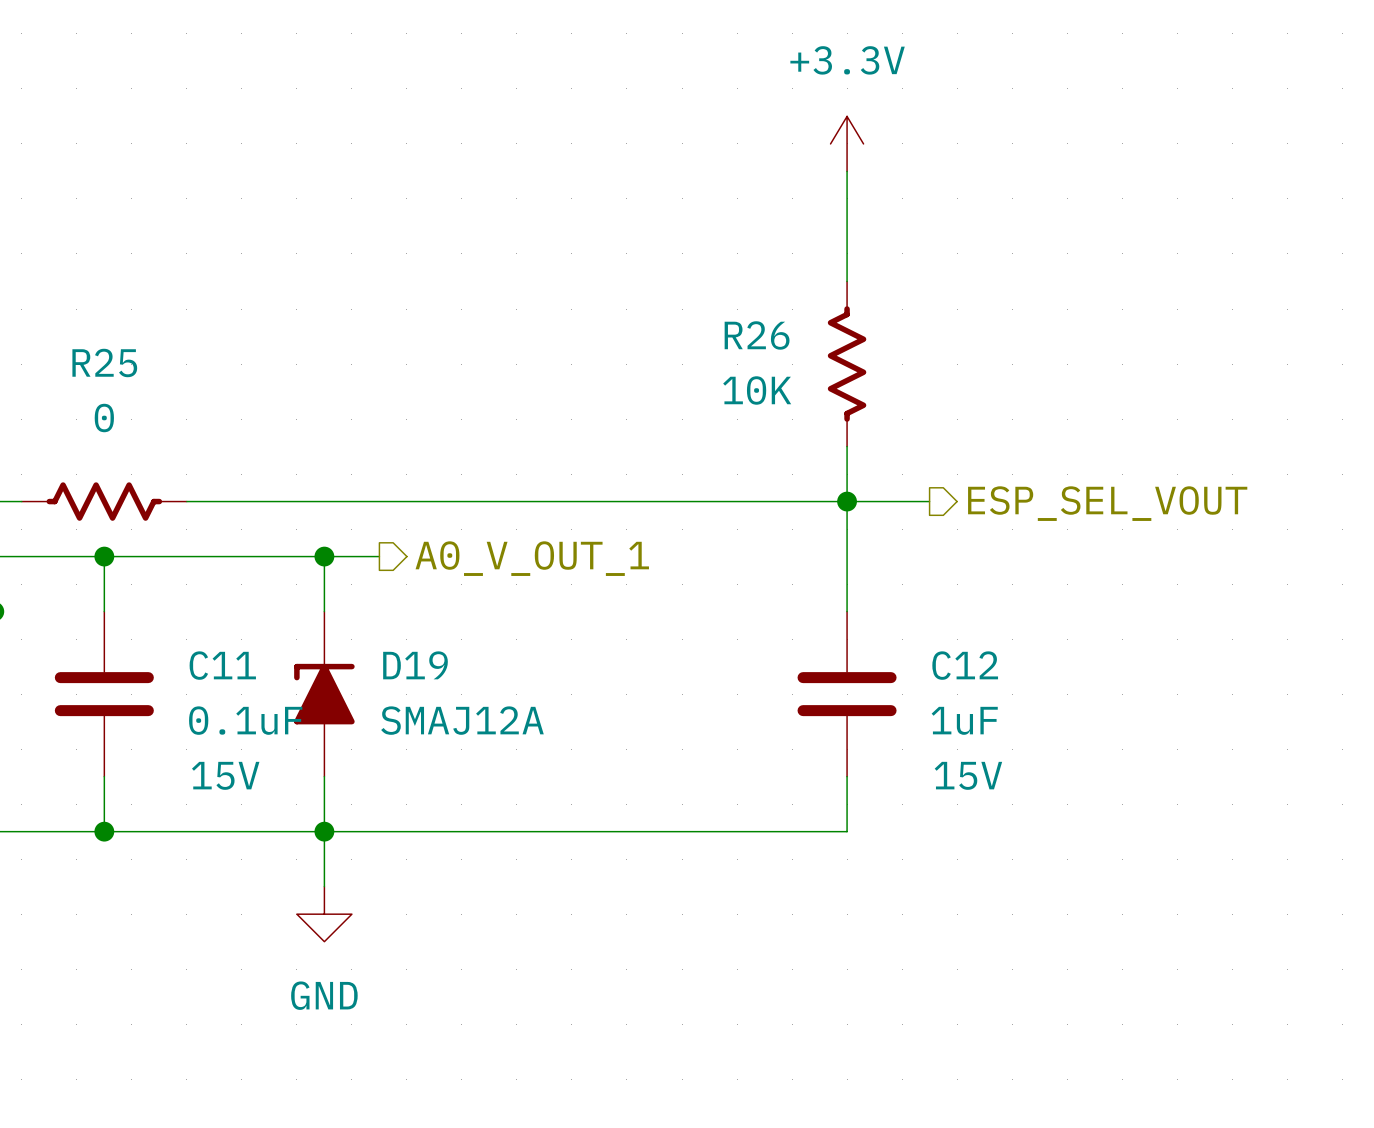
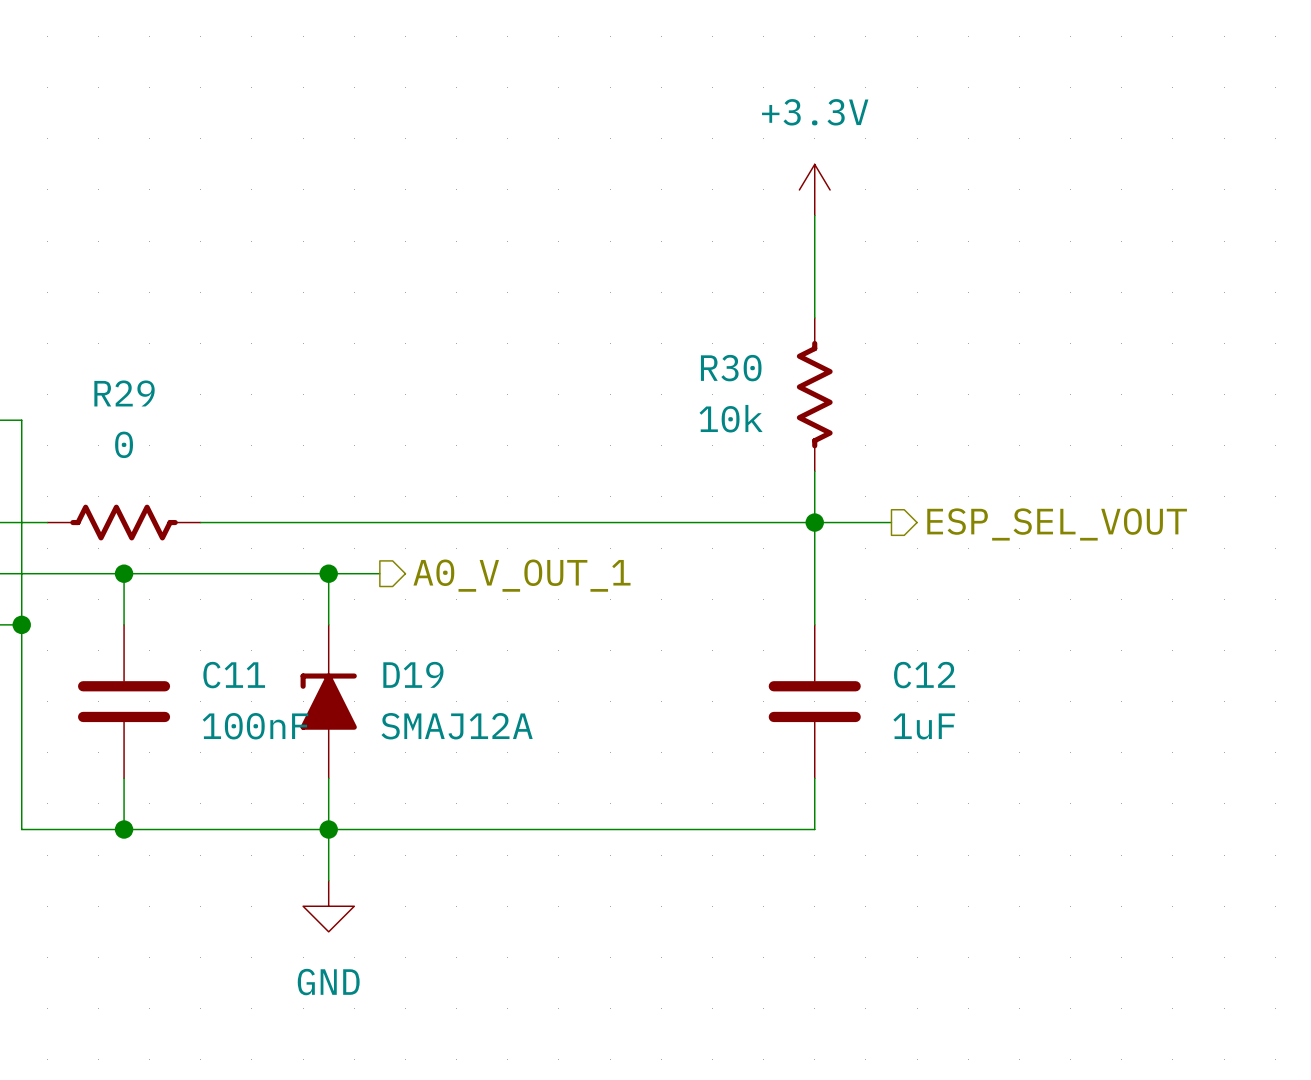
R26 name: R26 (757, 335) -> R30 (731, 368)
R25 name: R25 (104, 362) -> R29 (124, 393)
R26 value: 10K (757, 390) -> 10k (731, 418)
C11 value: 0.1uF (245, 720) -> 100nF (255, 726)
C11 text: 15V (225, 775) -> none
C12 text: 15V (968, 775) -> none

